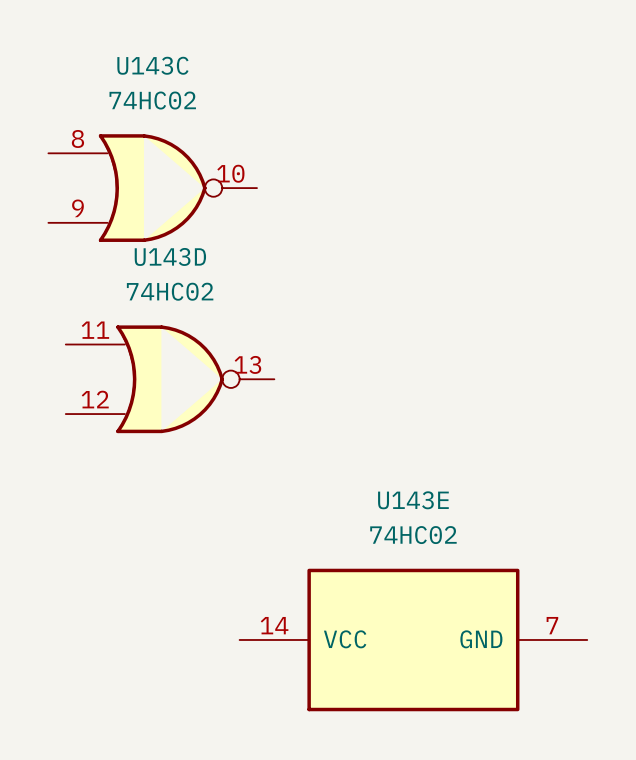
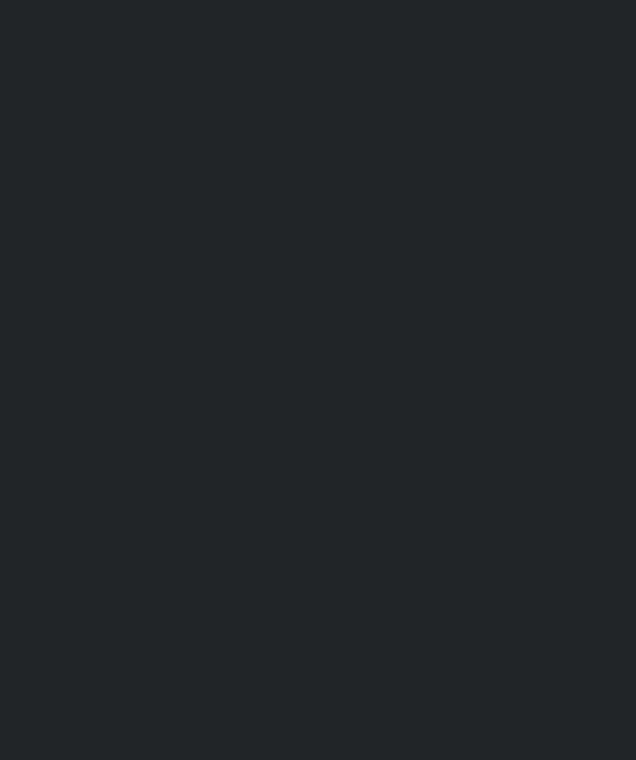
U143C: 74HC02 (152, 188) -> none
U143D: 74HC02 (170, 379) -> none
U143E: 74HC02 (413, 639) -> none

